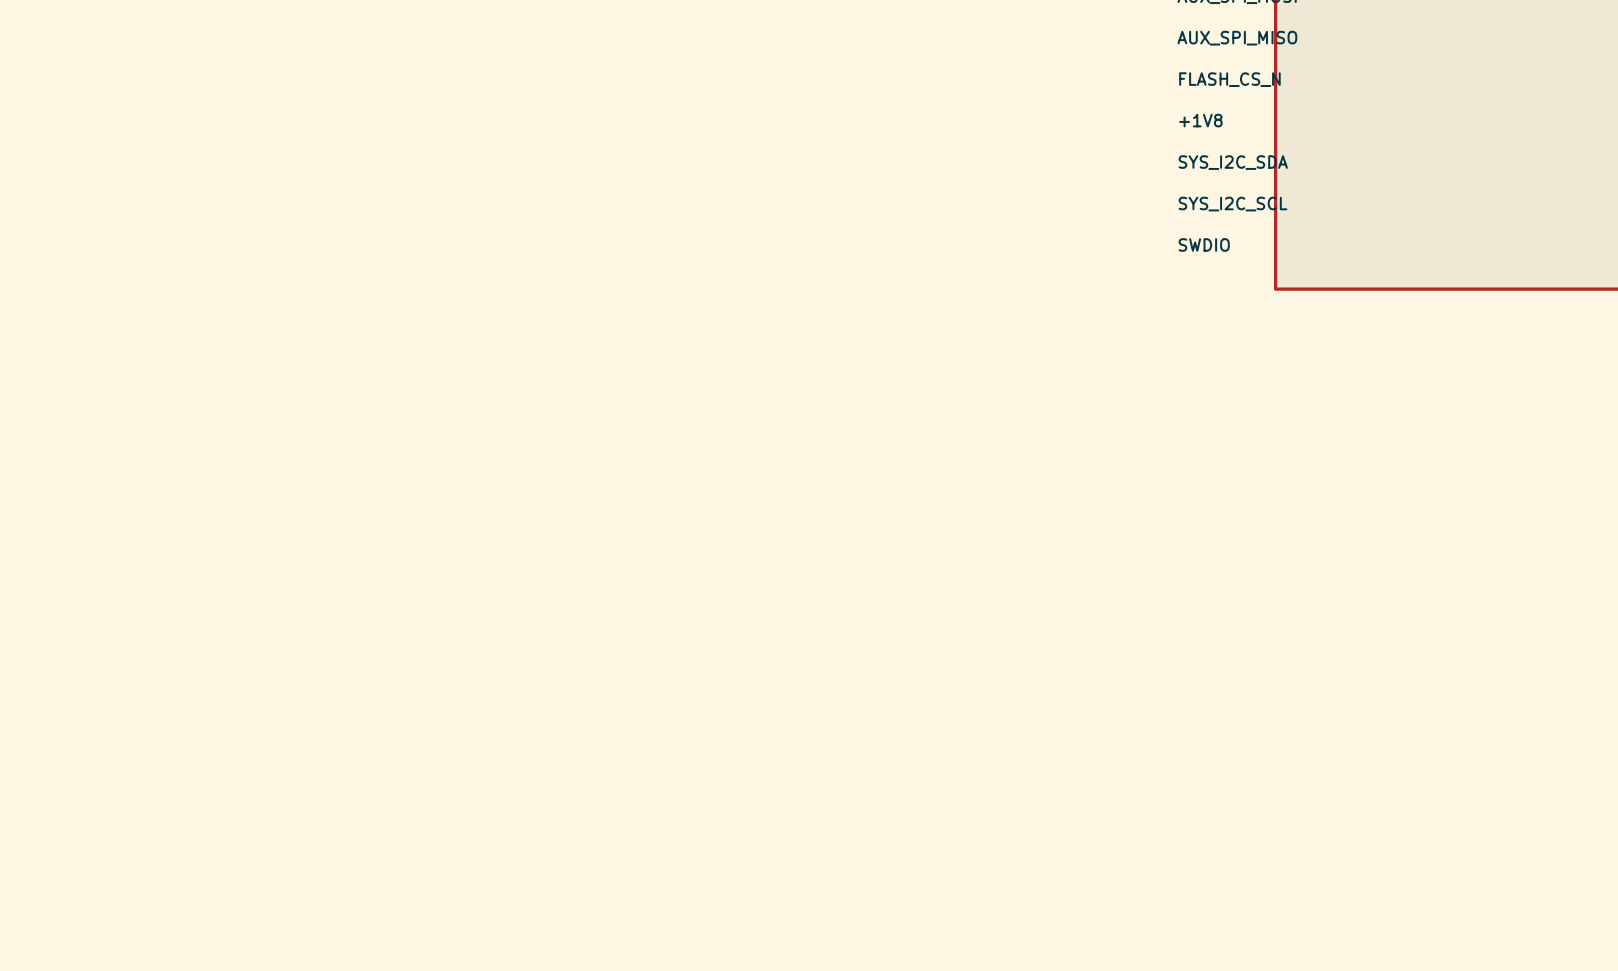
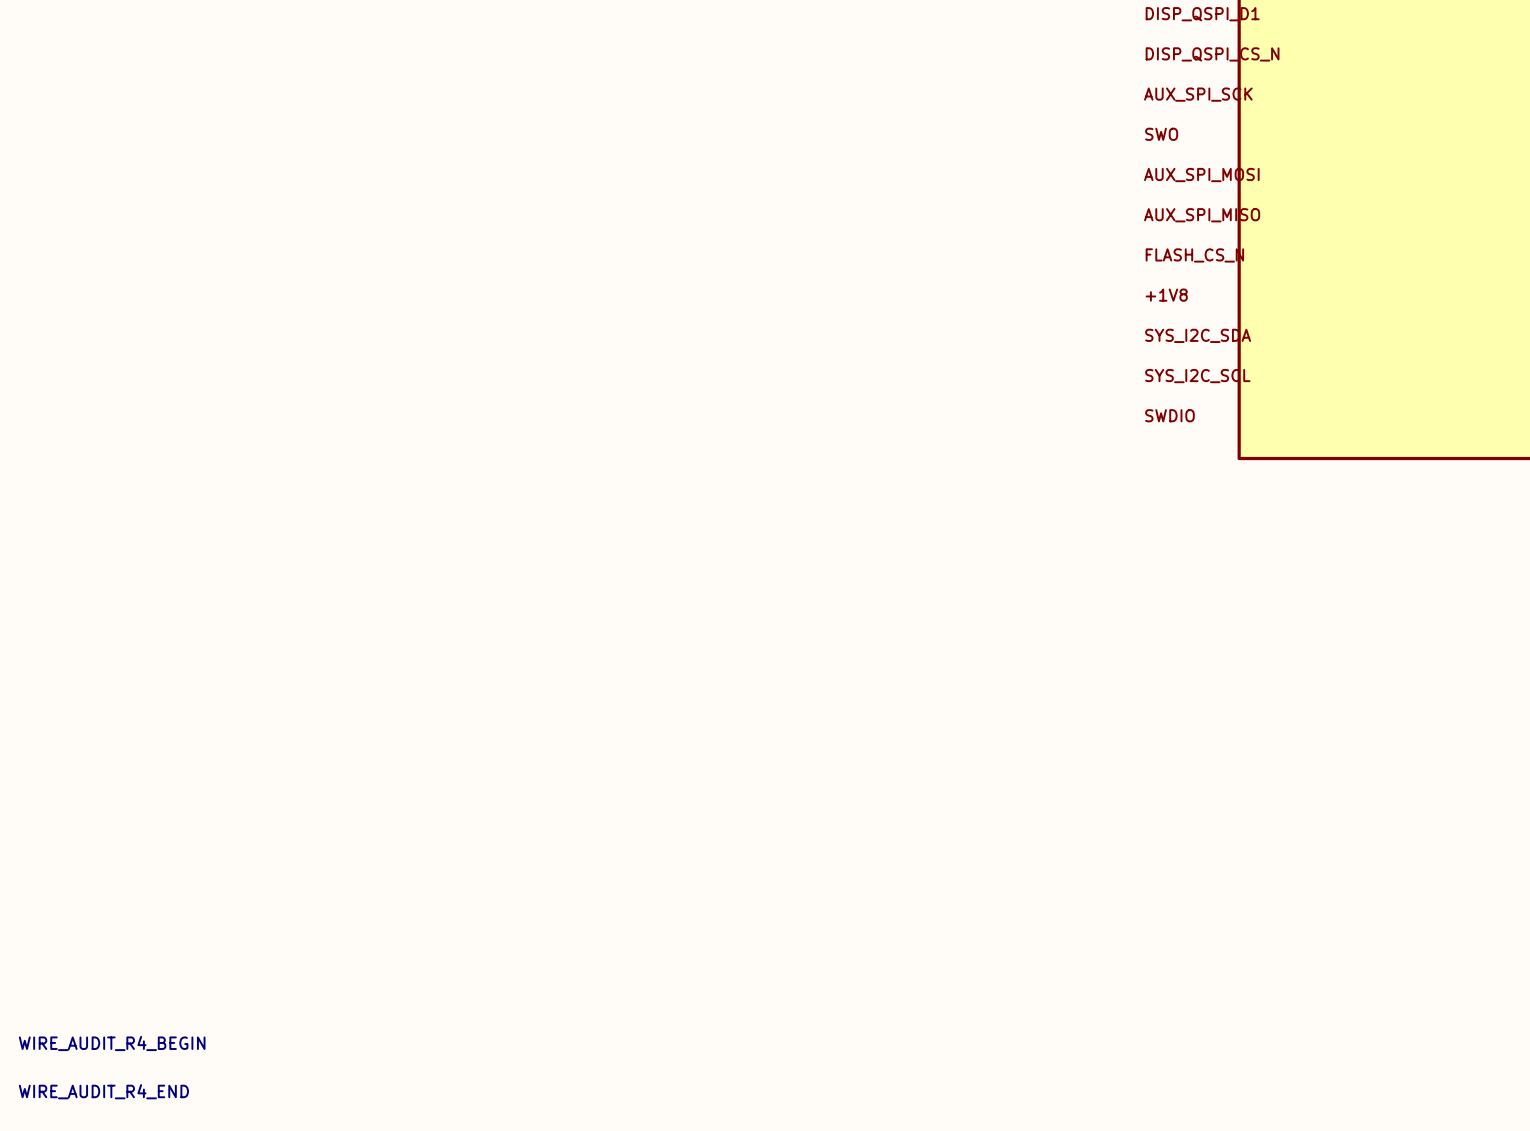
text: none -> WIRE_AUDIT_R4_BEGIN (112, 1043)
text: none -> WIRE_AUDIT_R4_END (103, 1091)

